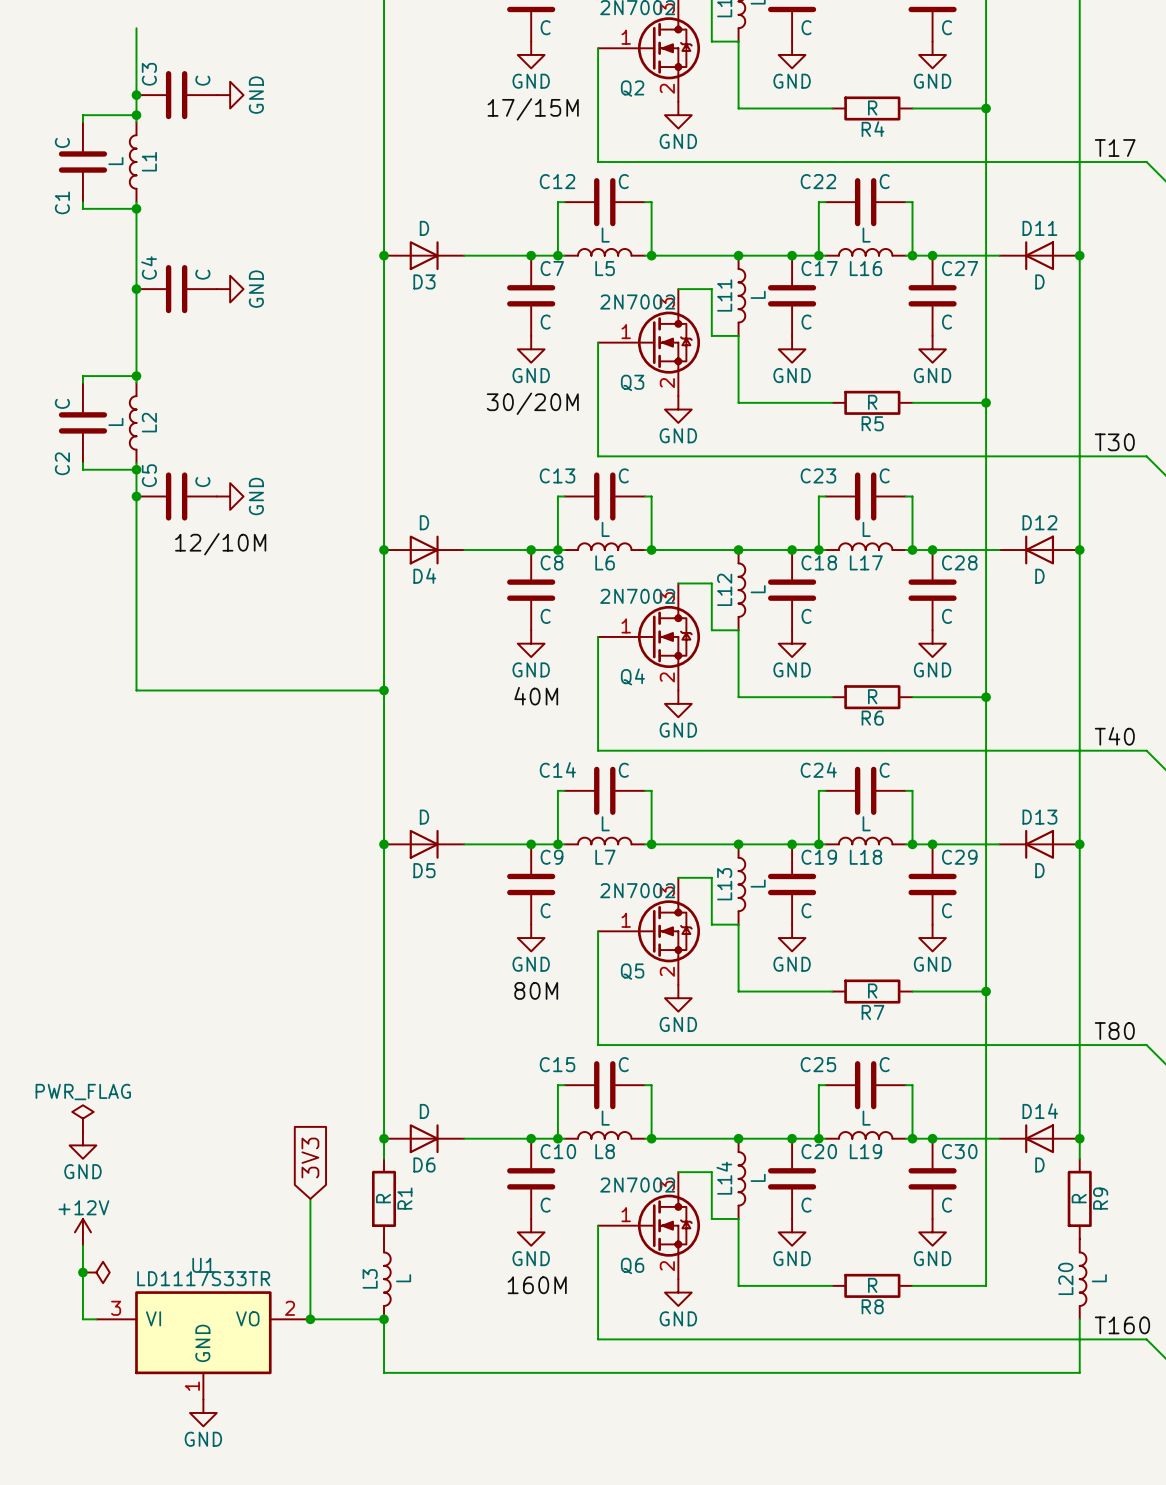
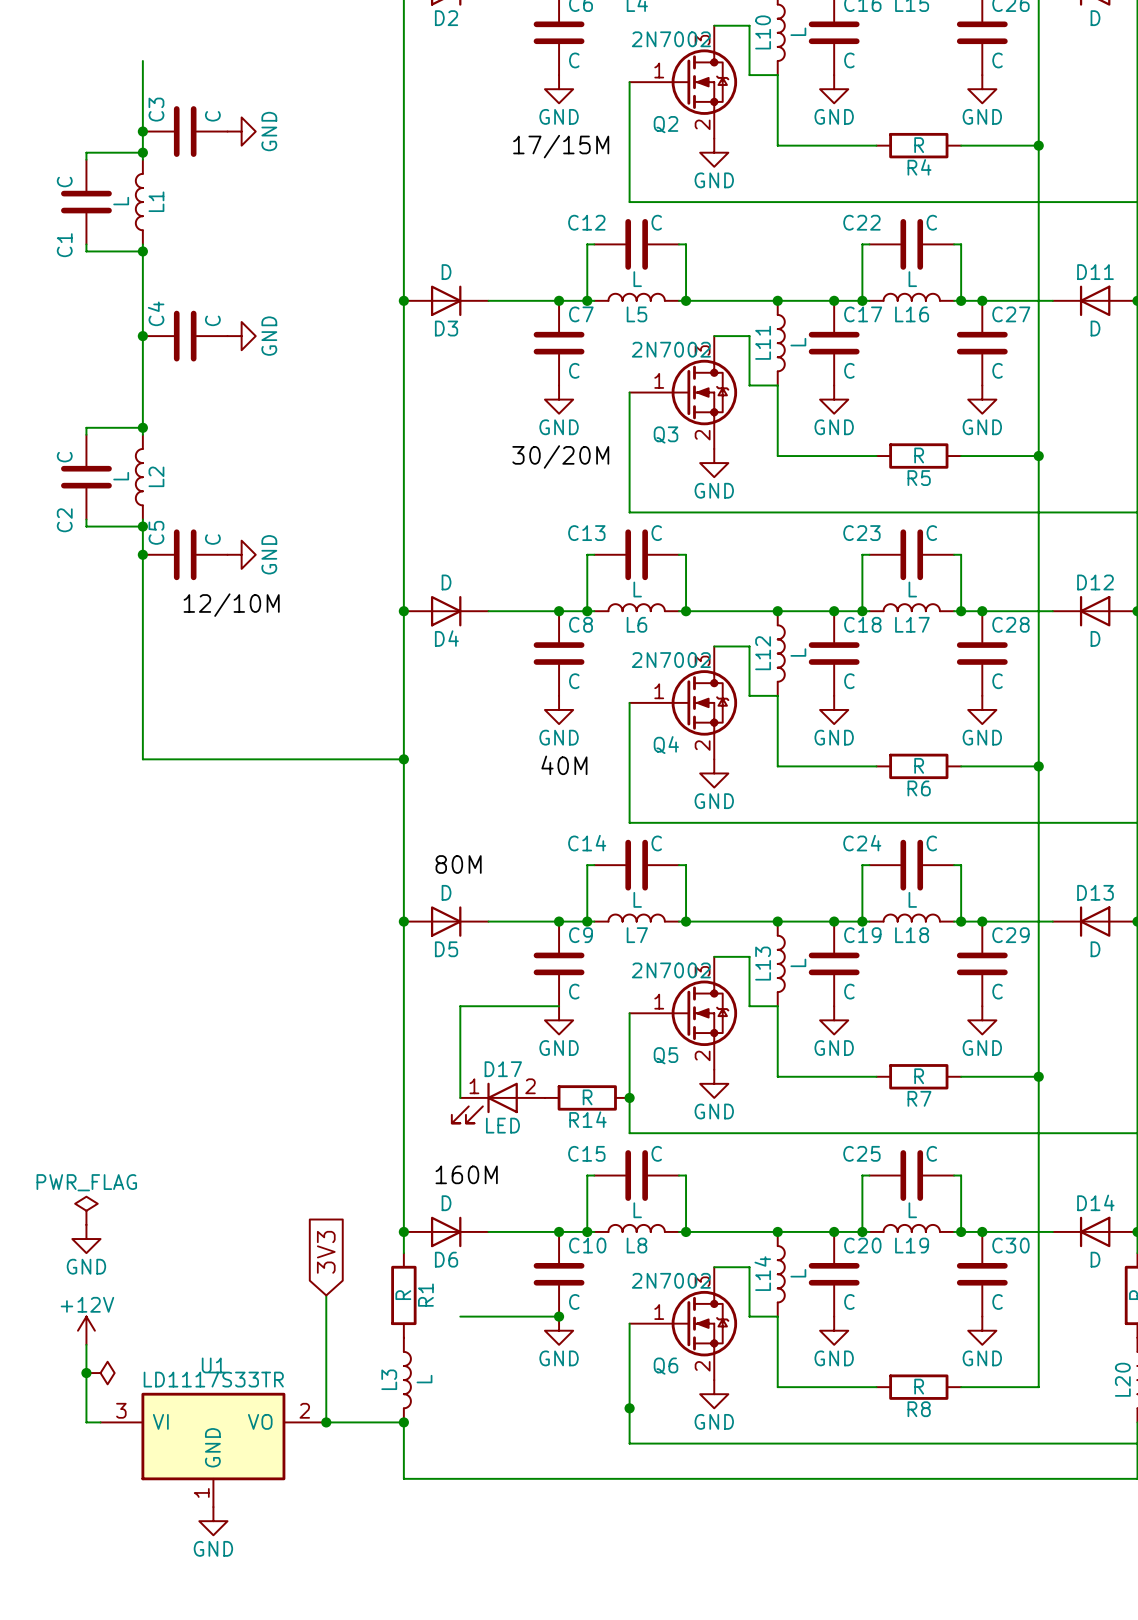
wire: none -> (559, 1006) (460, 1006) (460, 1097)
label position: 80M (536, 990) -> 80M (458, 864)
R14: none -> R (587, 1097)
junction: none -> (629, 1097)
D17: none -> LED (498, 1103)
wire: none -> (460, 1316) (559, 1316)
junction: none -> (559, 1316)
label position: 160M (537, 1285) -> 160M (466, 1174)
junction: none -> (629, 1408)

